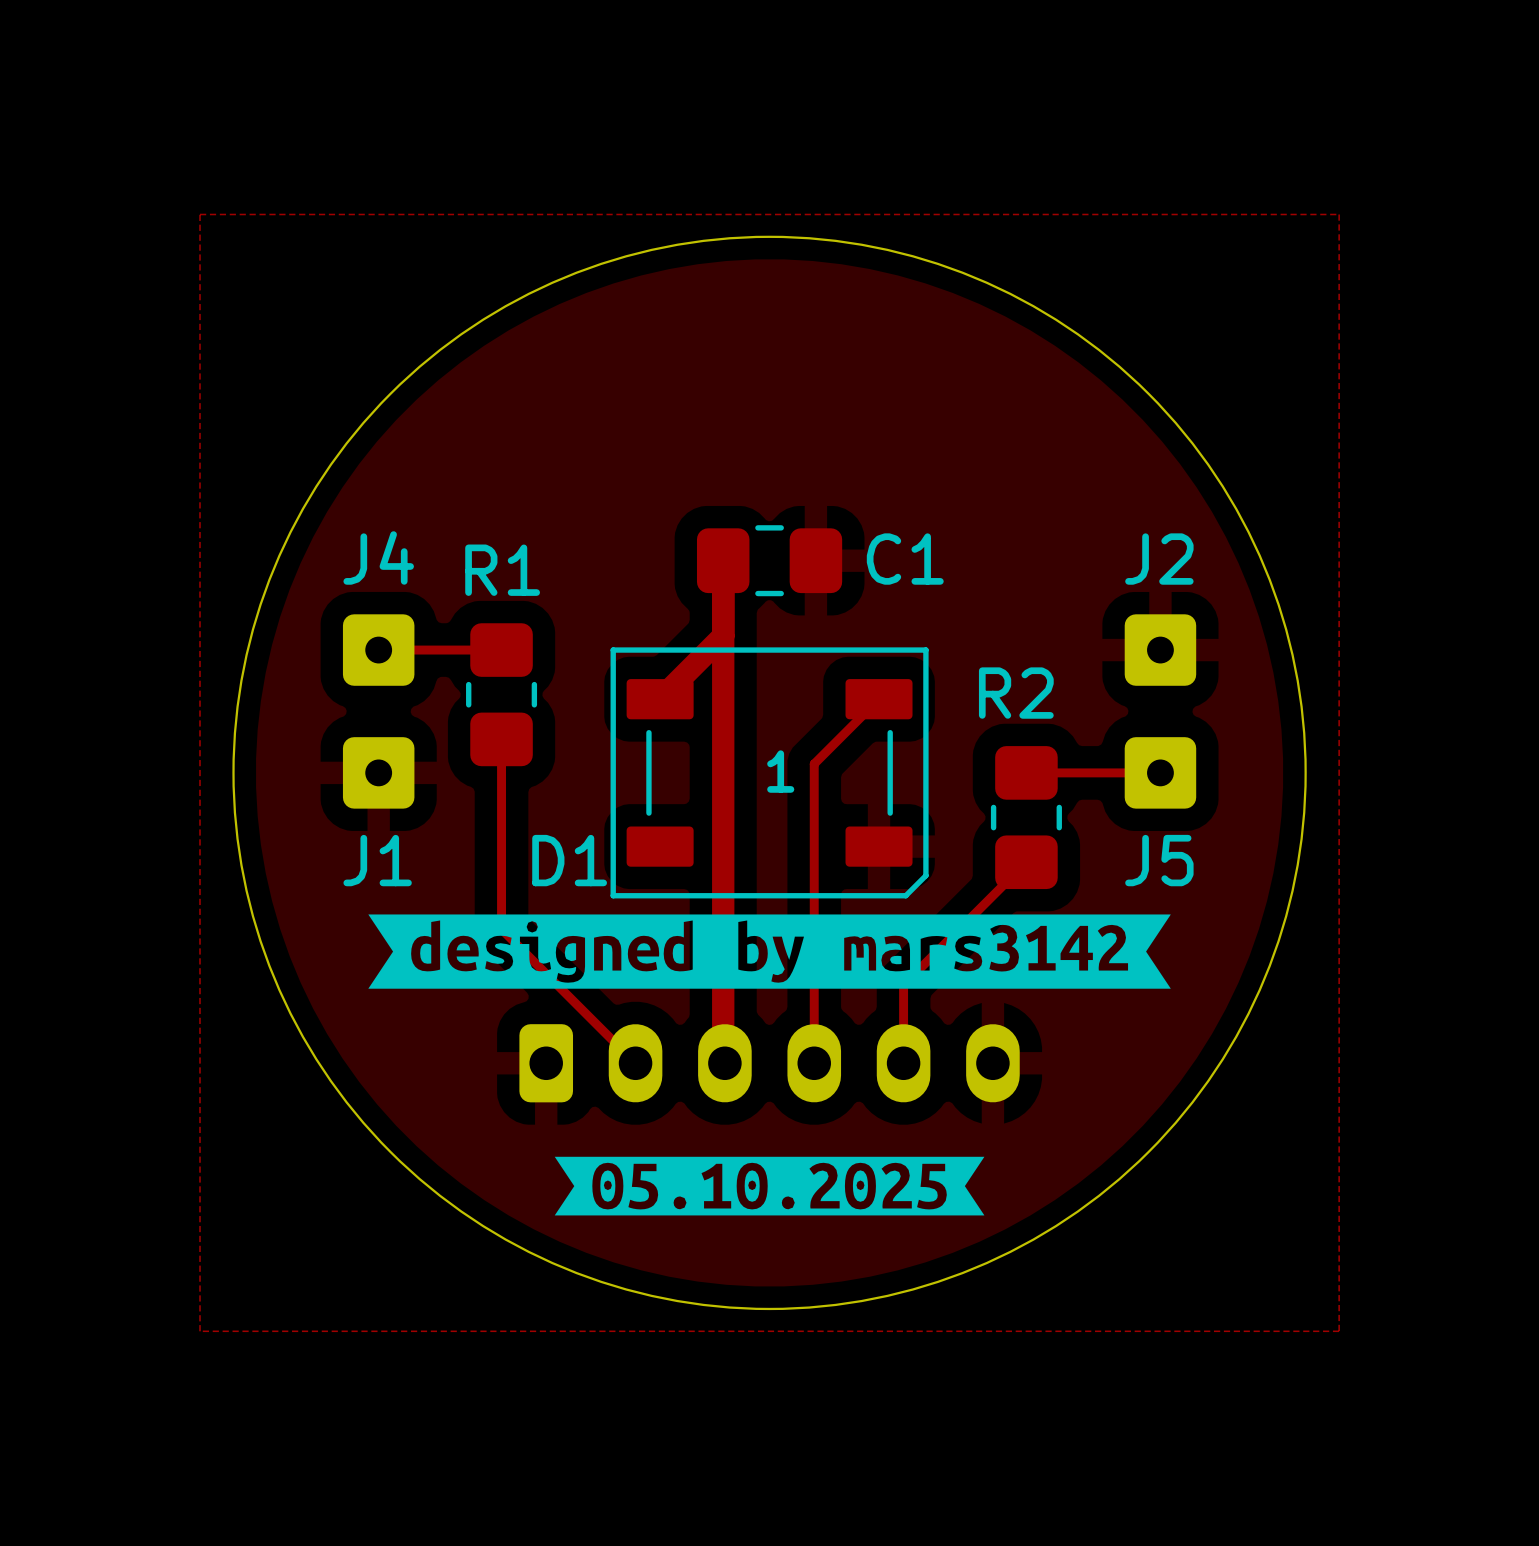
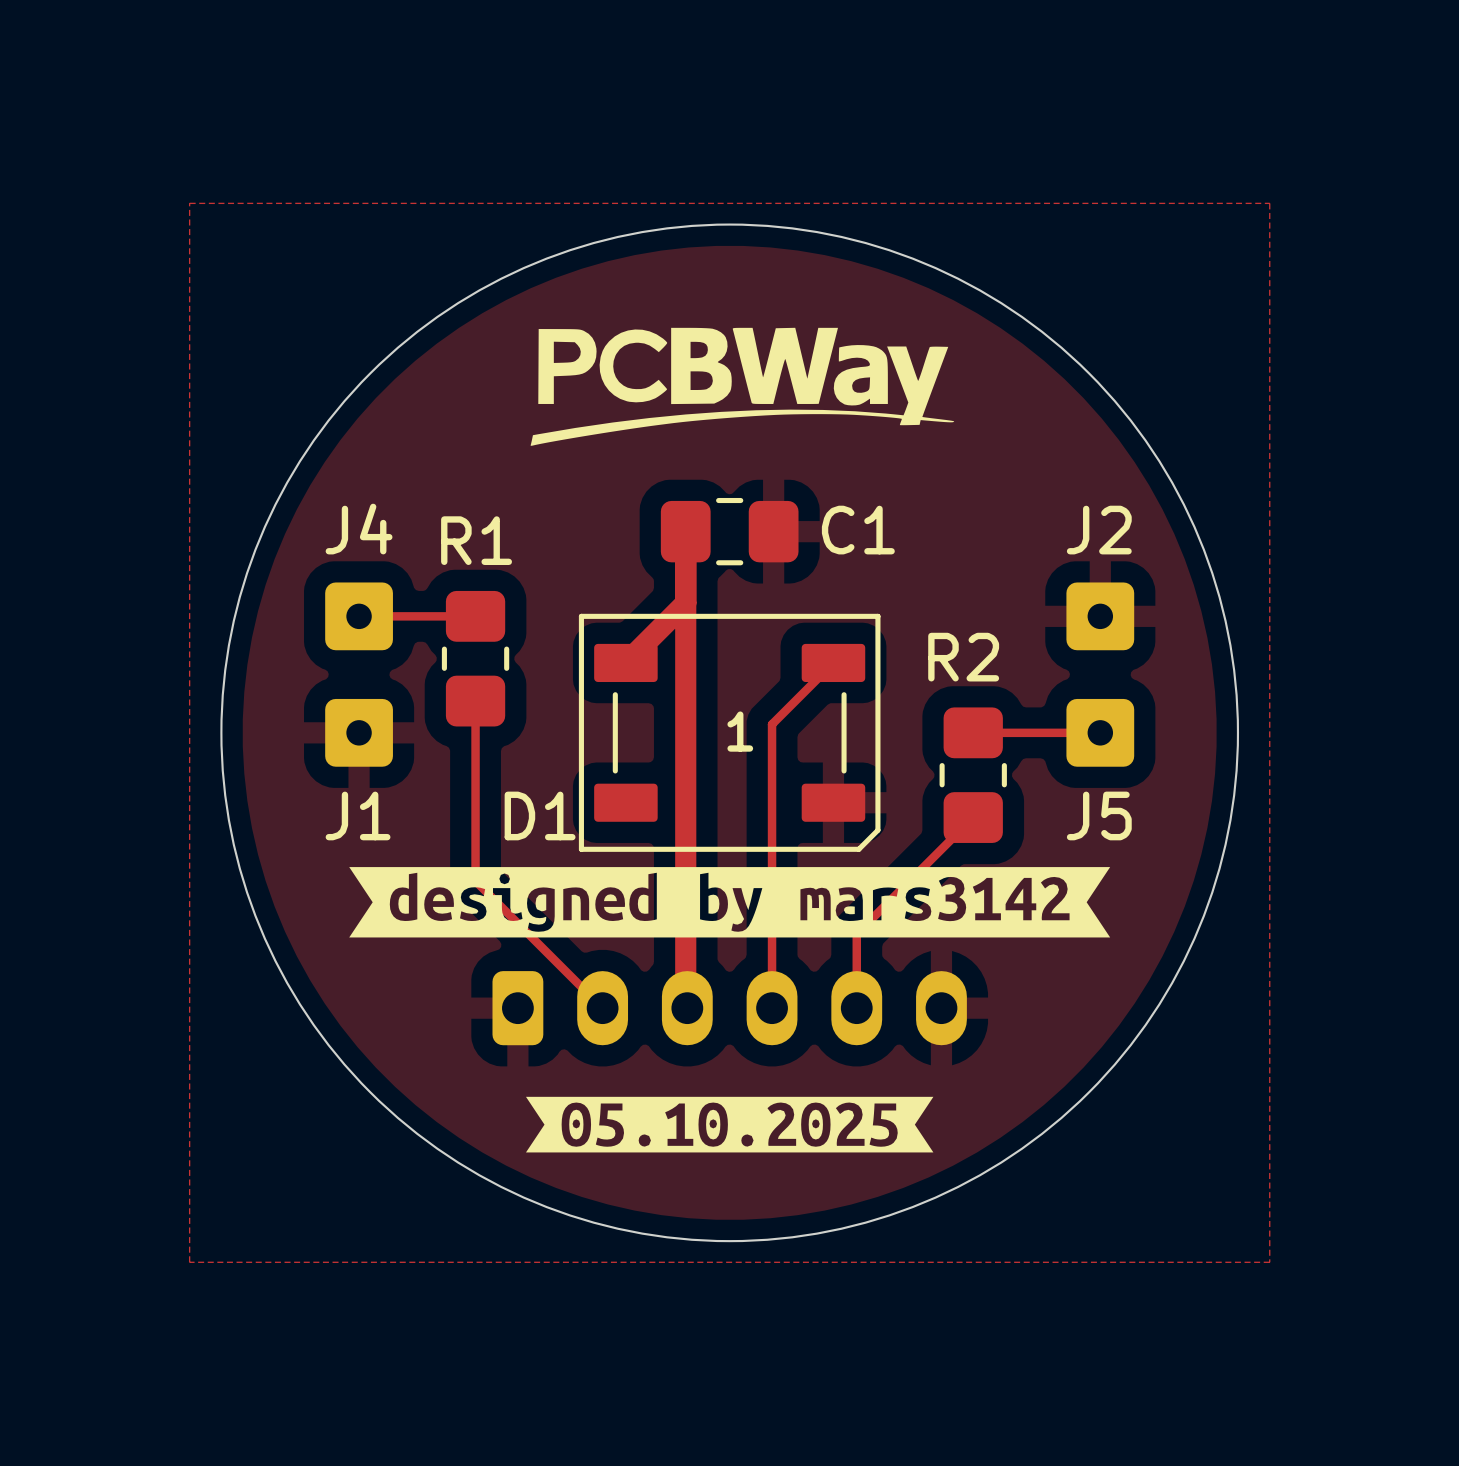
drawing: none -> [530, 327, 955, 446]

